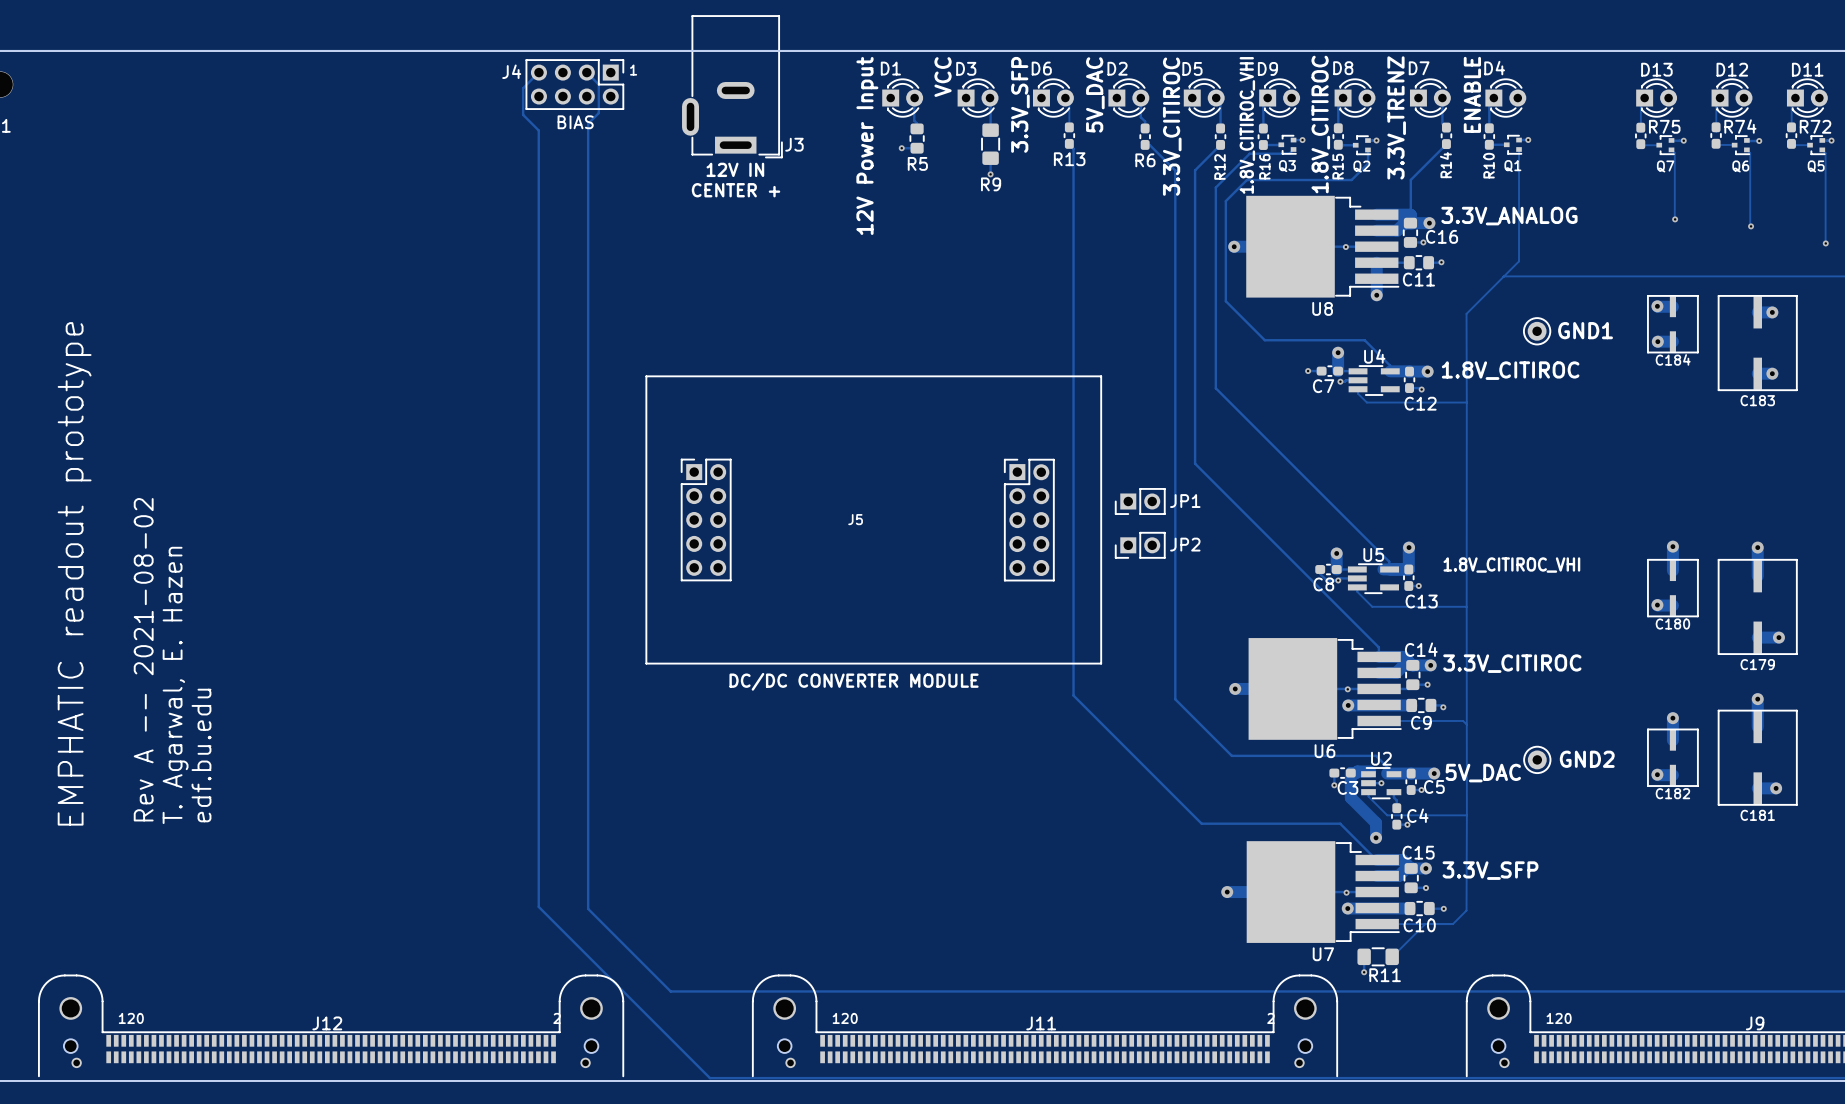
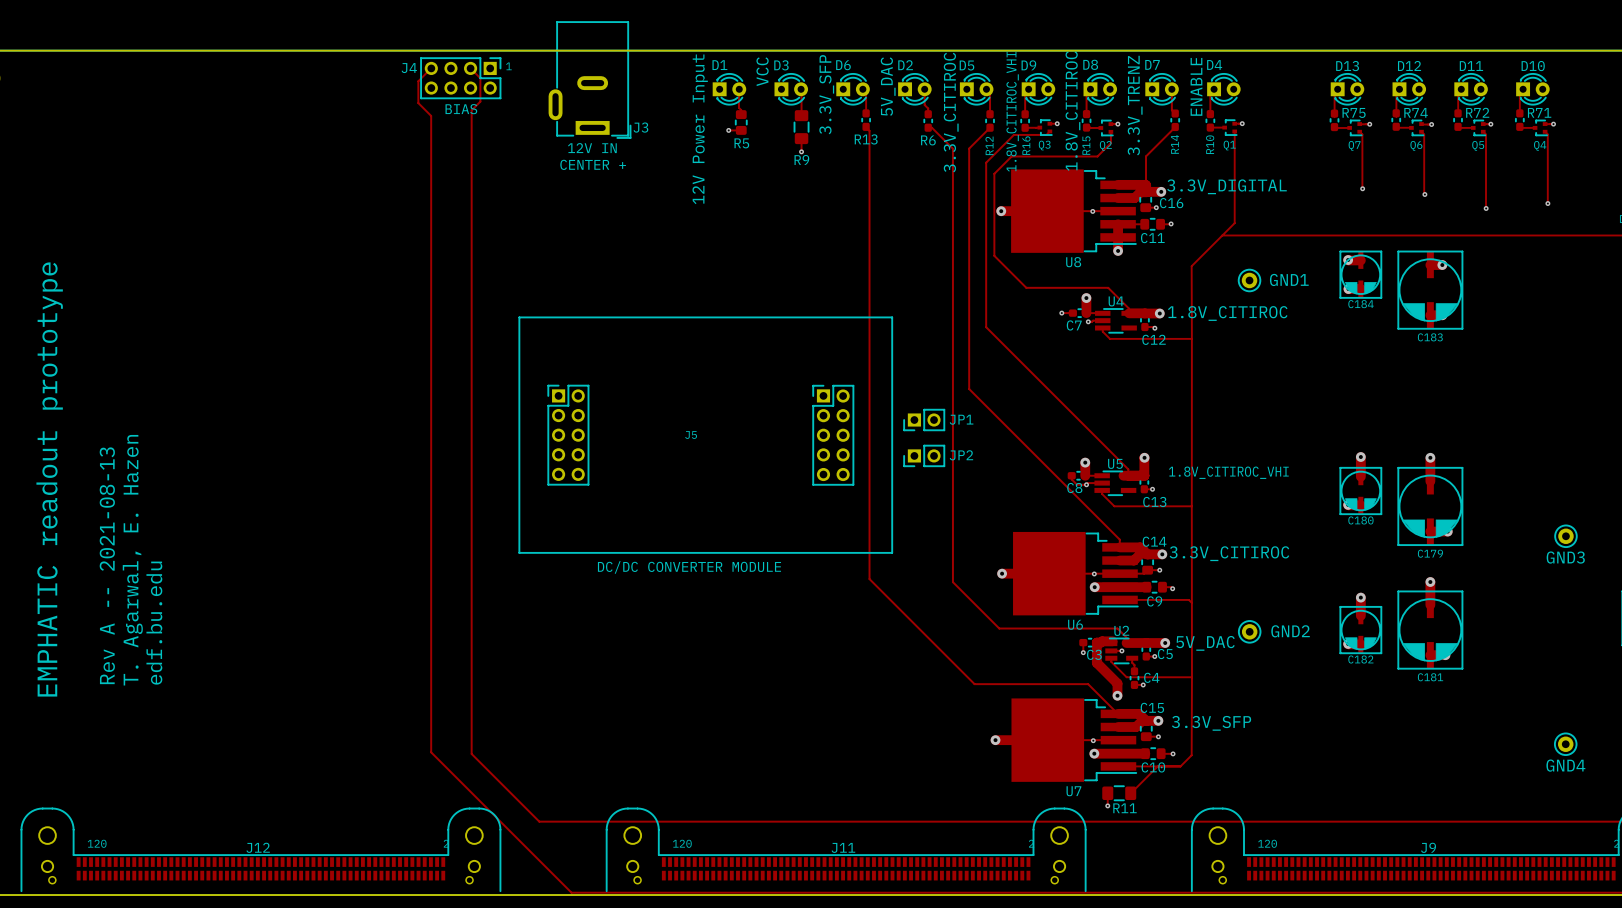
text: 3.3V_ANALOG (1509, 216) -> 3.3V_DIGITAL (1226, 186)
C184 footprint: [1647, 295, 1699, 354] -> [1339, 251, 1382, 299]
C183 footprint: [1718, 295, 1798, 391] -> [1397, 251, 1463, 330]
C180 footprint: [1647, 559, 1699, 617] -> [1339, 467, 1382, 515]
C179 footprint: [1718, 559, 1798, 655] -> [1397, 467, 1463, 546]
text: Rev A -- 2021-08-02 (143, 659) -> Rev A -- 2021-08-13 (107, 565)
C181 footprint: [1718, 710, 1798, 806] -> [1397, 590, 1463, 670]
C182 footprint: [1647, 728, 1699, 787] -> [1339, 606, 1382, 654]

